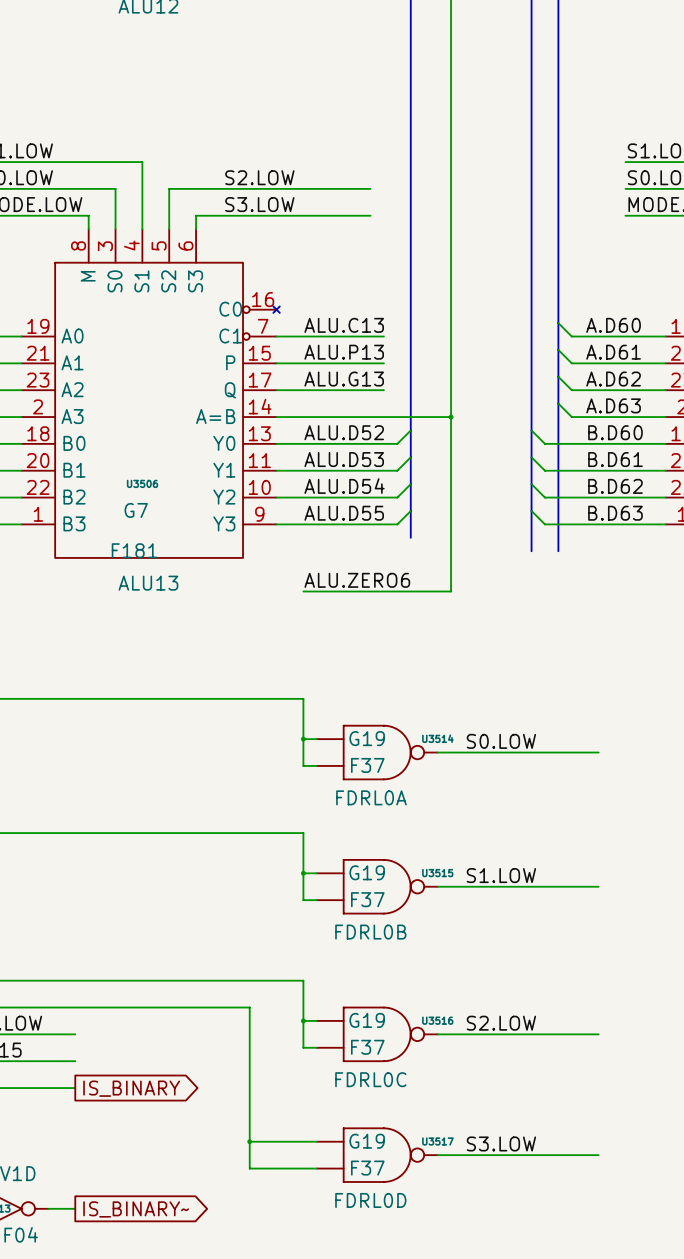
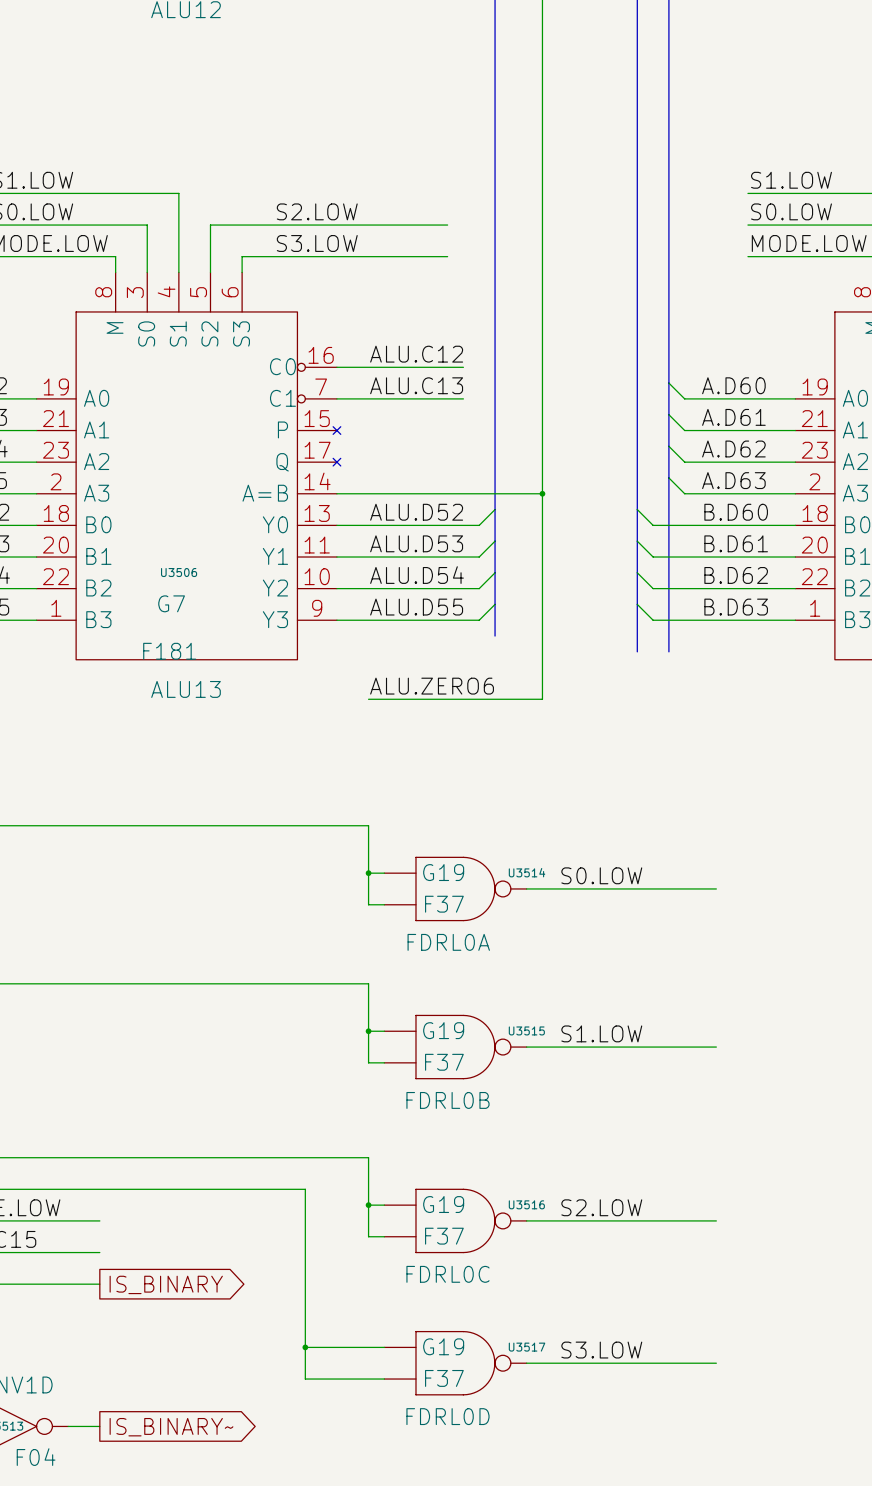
label: none -> ALU.C12 (416, 354)
no-connect mark: (276, 309) -> none
label: ALU.P13 (344, 352) -> none
wire: (276, 363) (383, 363) -> (336, 367) (463, 367)
no-connect mark: none -> (336, 430)
label: ALU.G13 (344, 379) -> none
wire: (276, 390) (383, 390) -> none
no-connect mark: none -> (336, 462)

